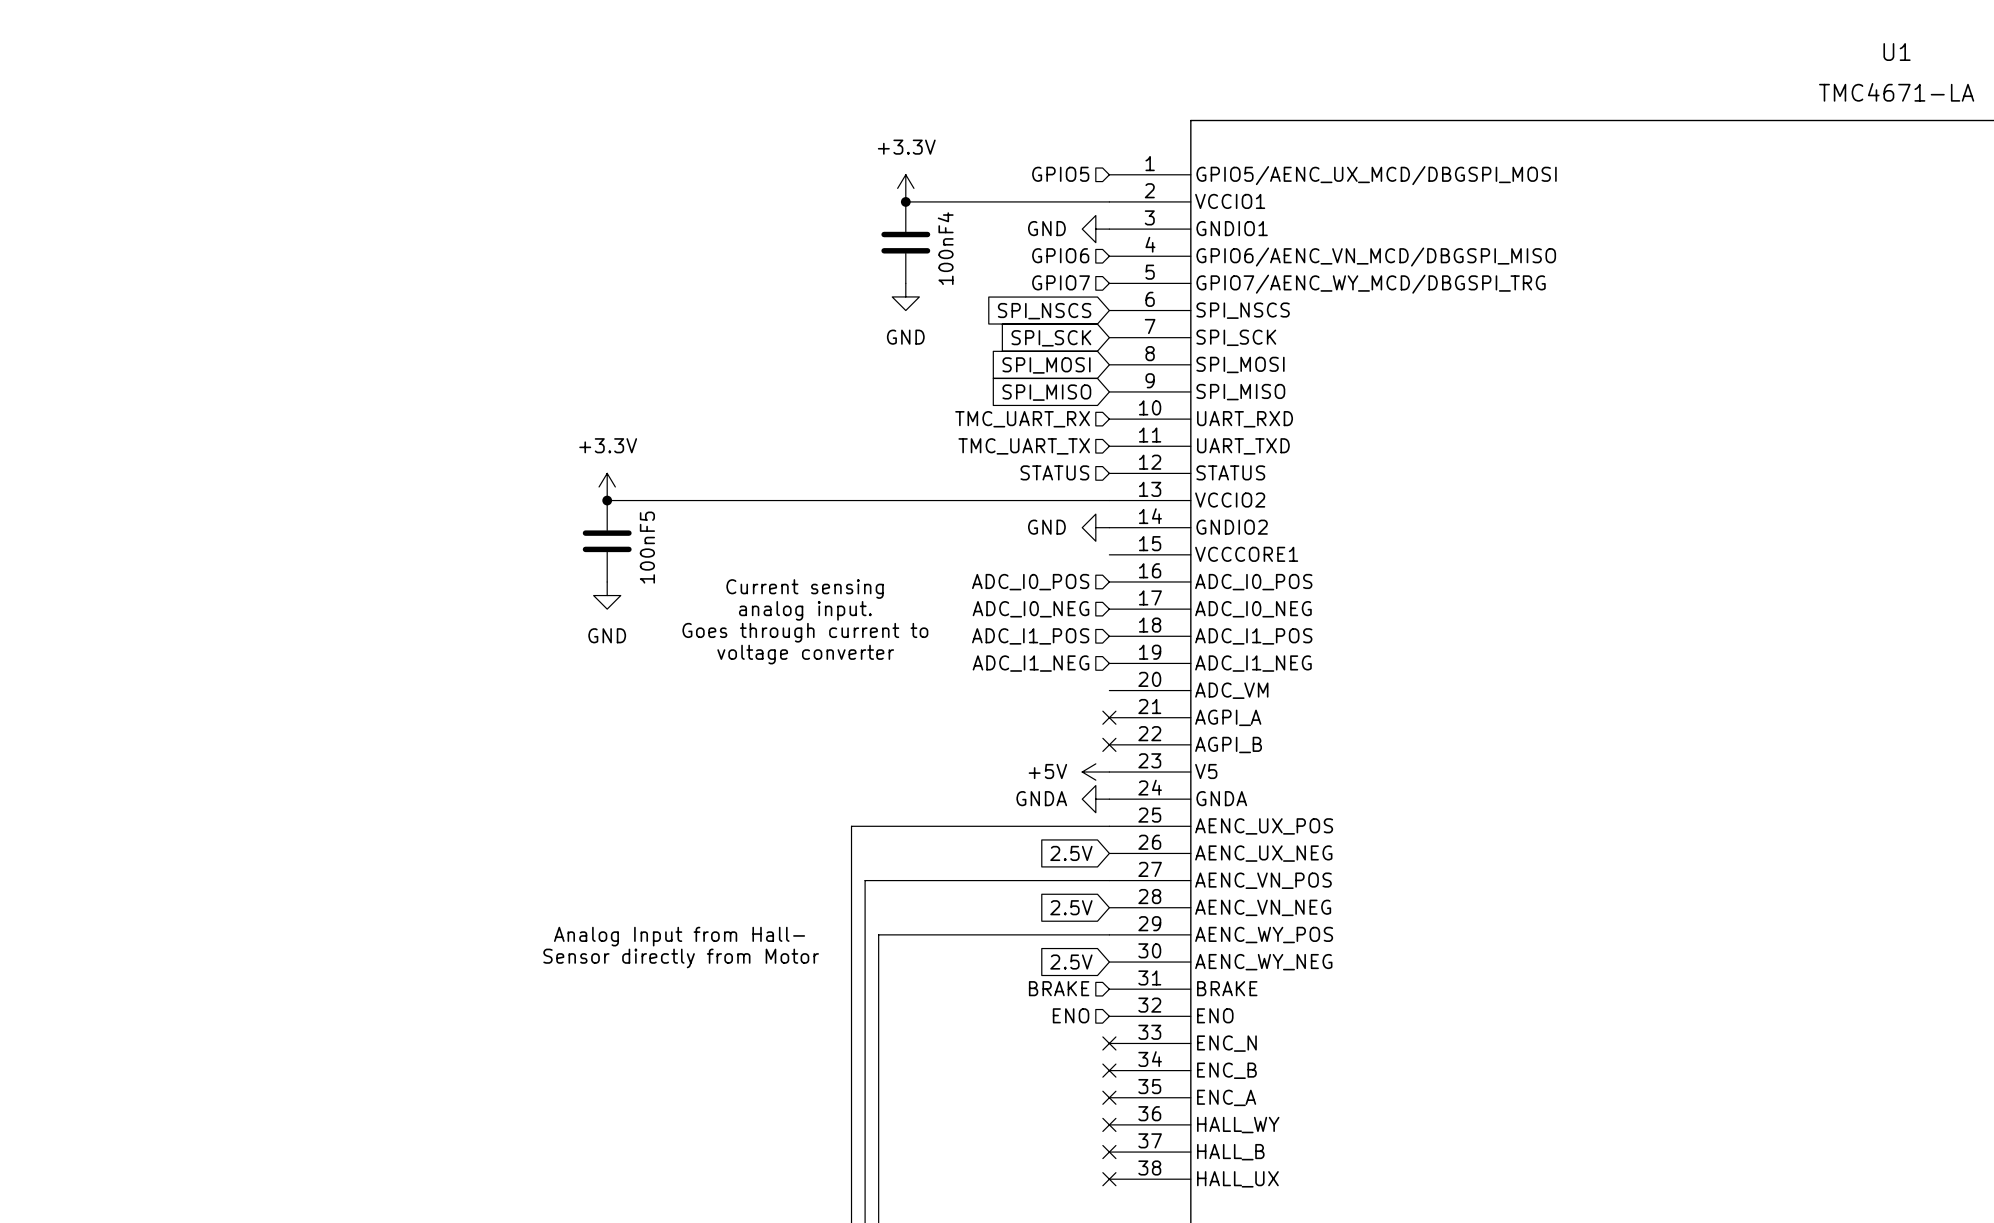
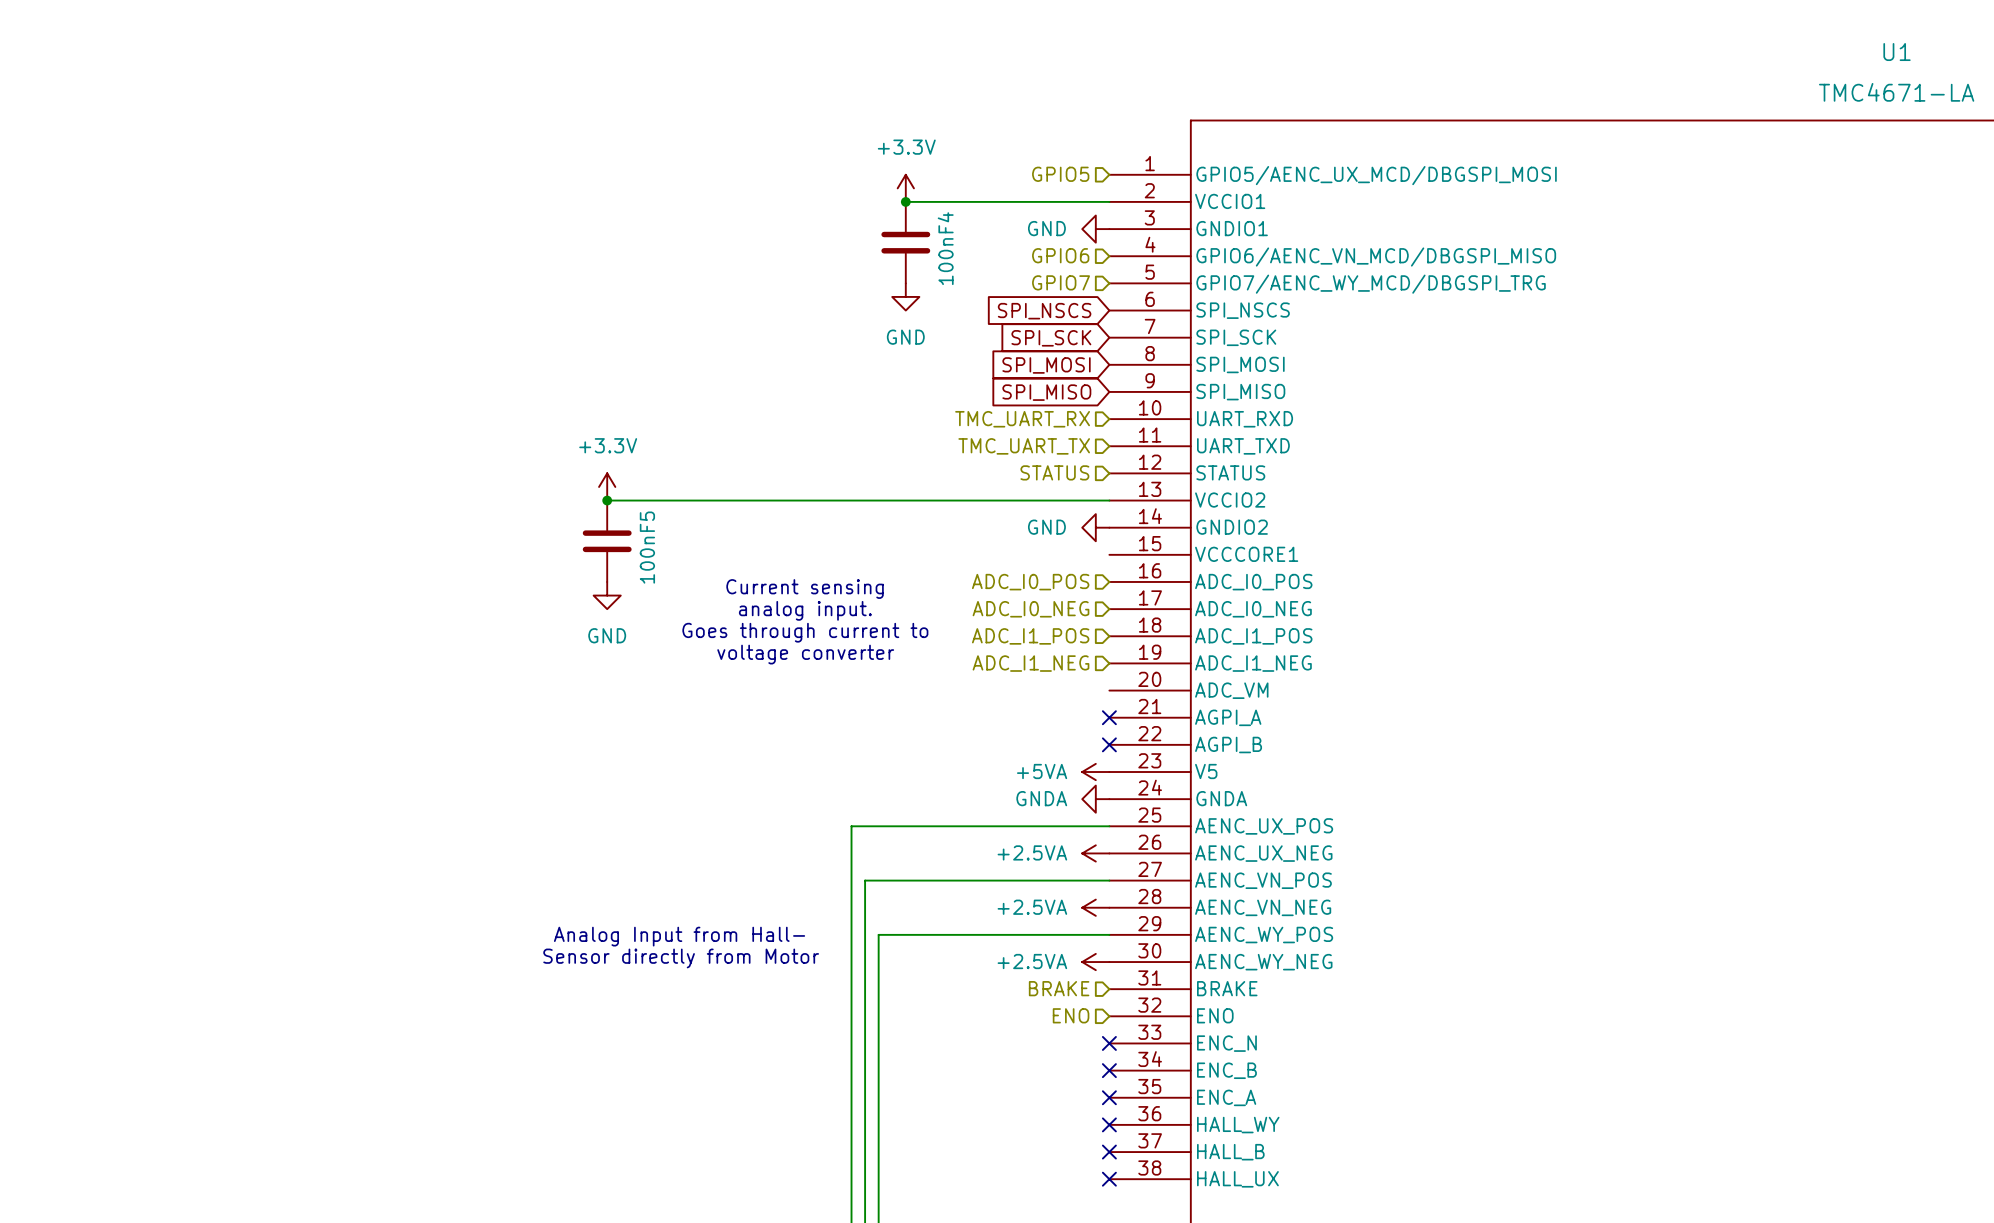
power symbol: +5V (1095, 772) -> +5VA (1095, 772)
global label: 2.5V (1071, 853) -> none
power symbol: none -> +2.5VA (1095, 853)
global label: 2.5V (1071, 907) -> none
power symbol: none -> +2.5VA (1095, 907)
global label: 2.5V (1071, 962) -> none
power symbol: none -> +2.5VA (1095, 962)

